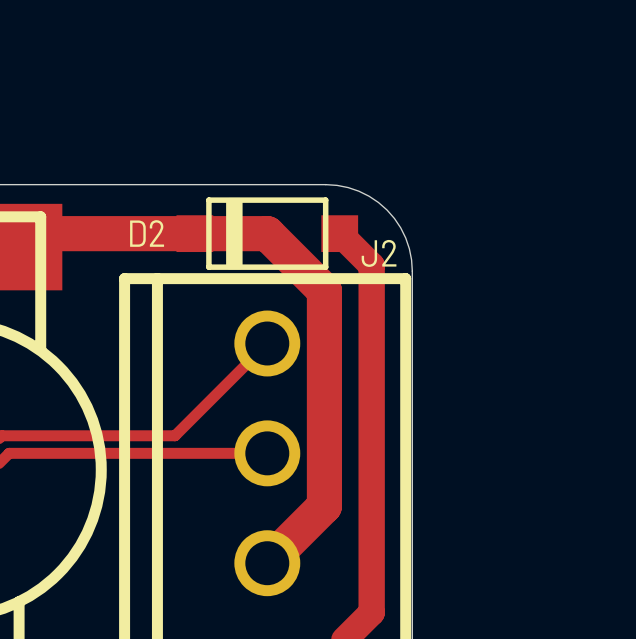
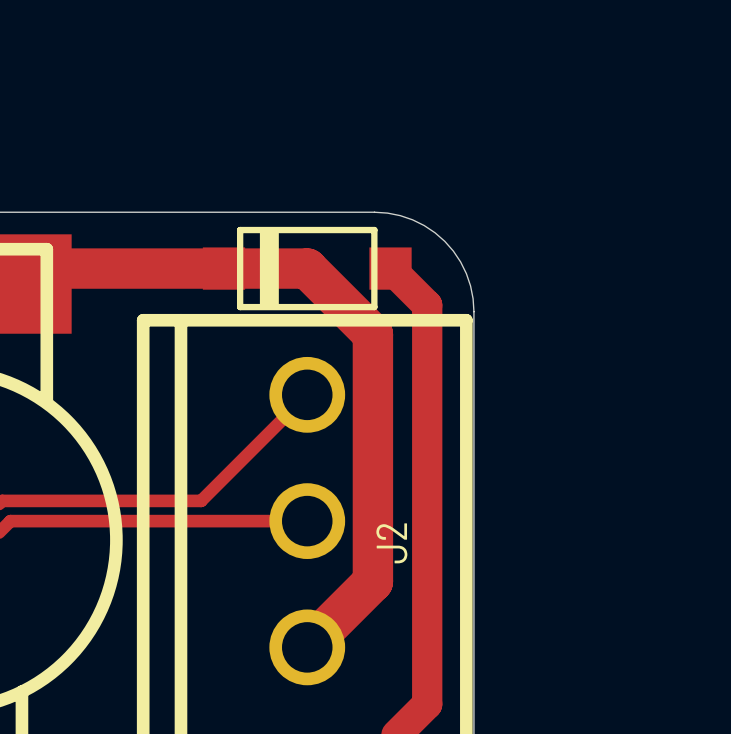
D2 name: D2 (147, 233) -> none
J2 name rotation: 0° (379, 253) -> 90° counterclockwise (391, 543)
J2 name position: J2 (379, 253) -> J2 (391, 543)

